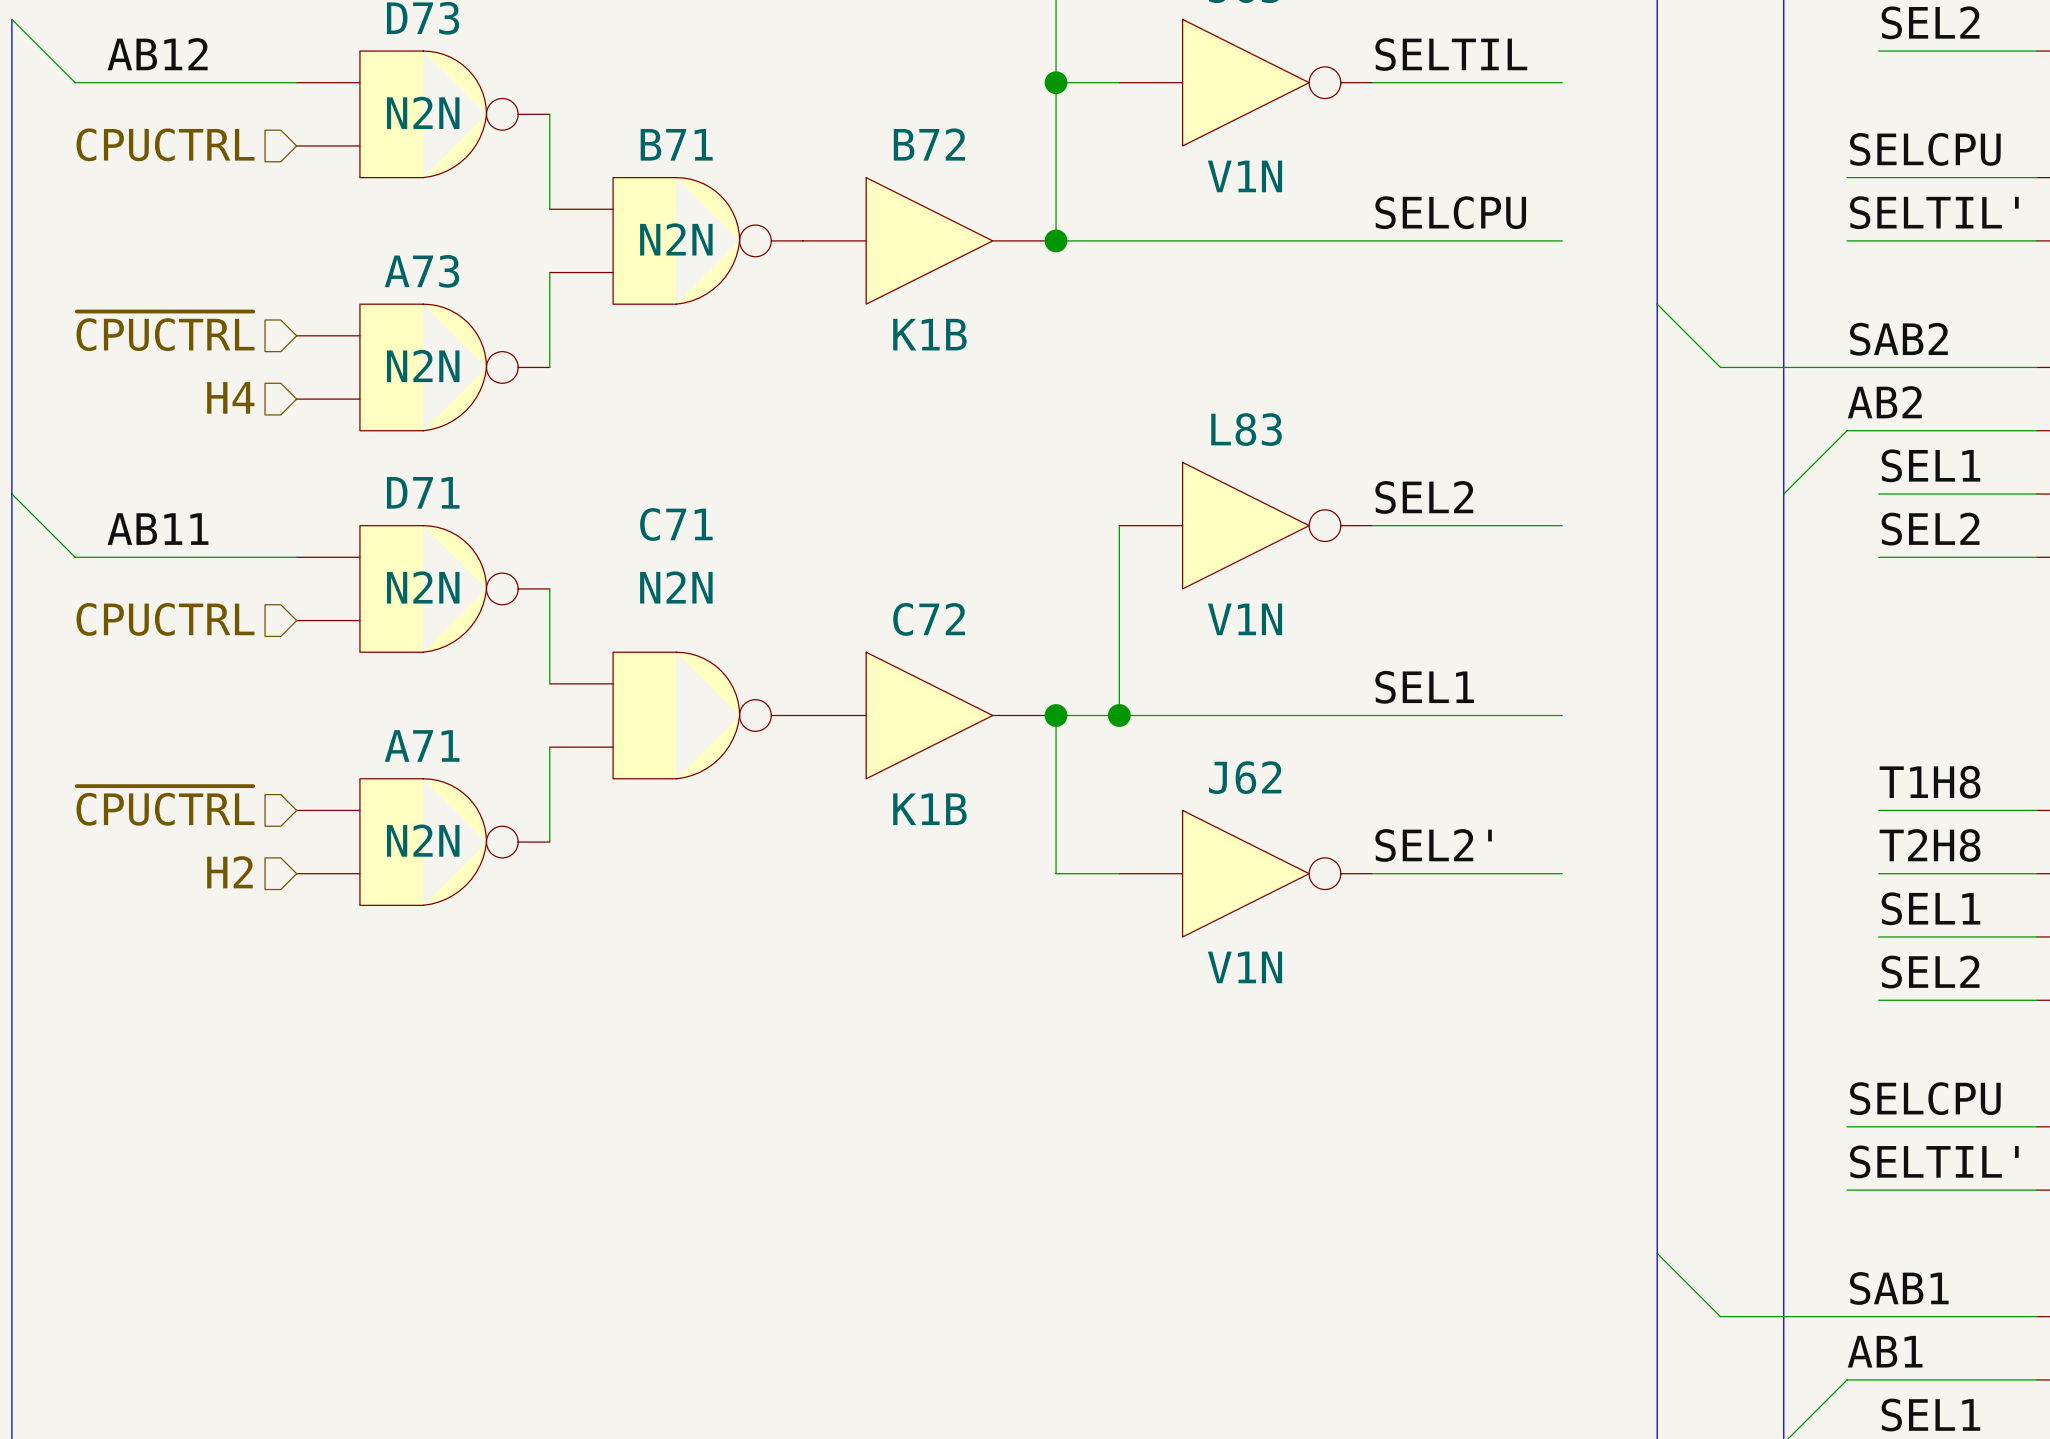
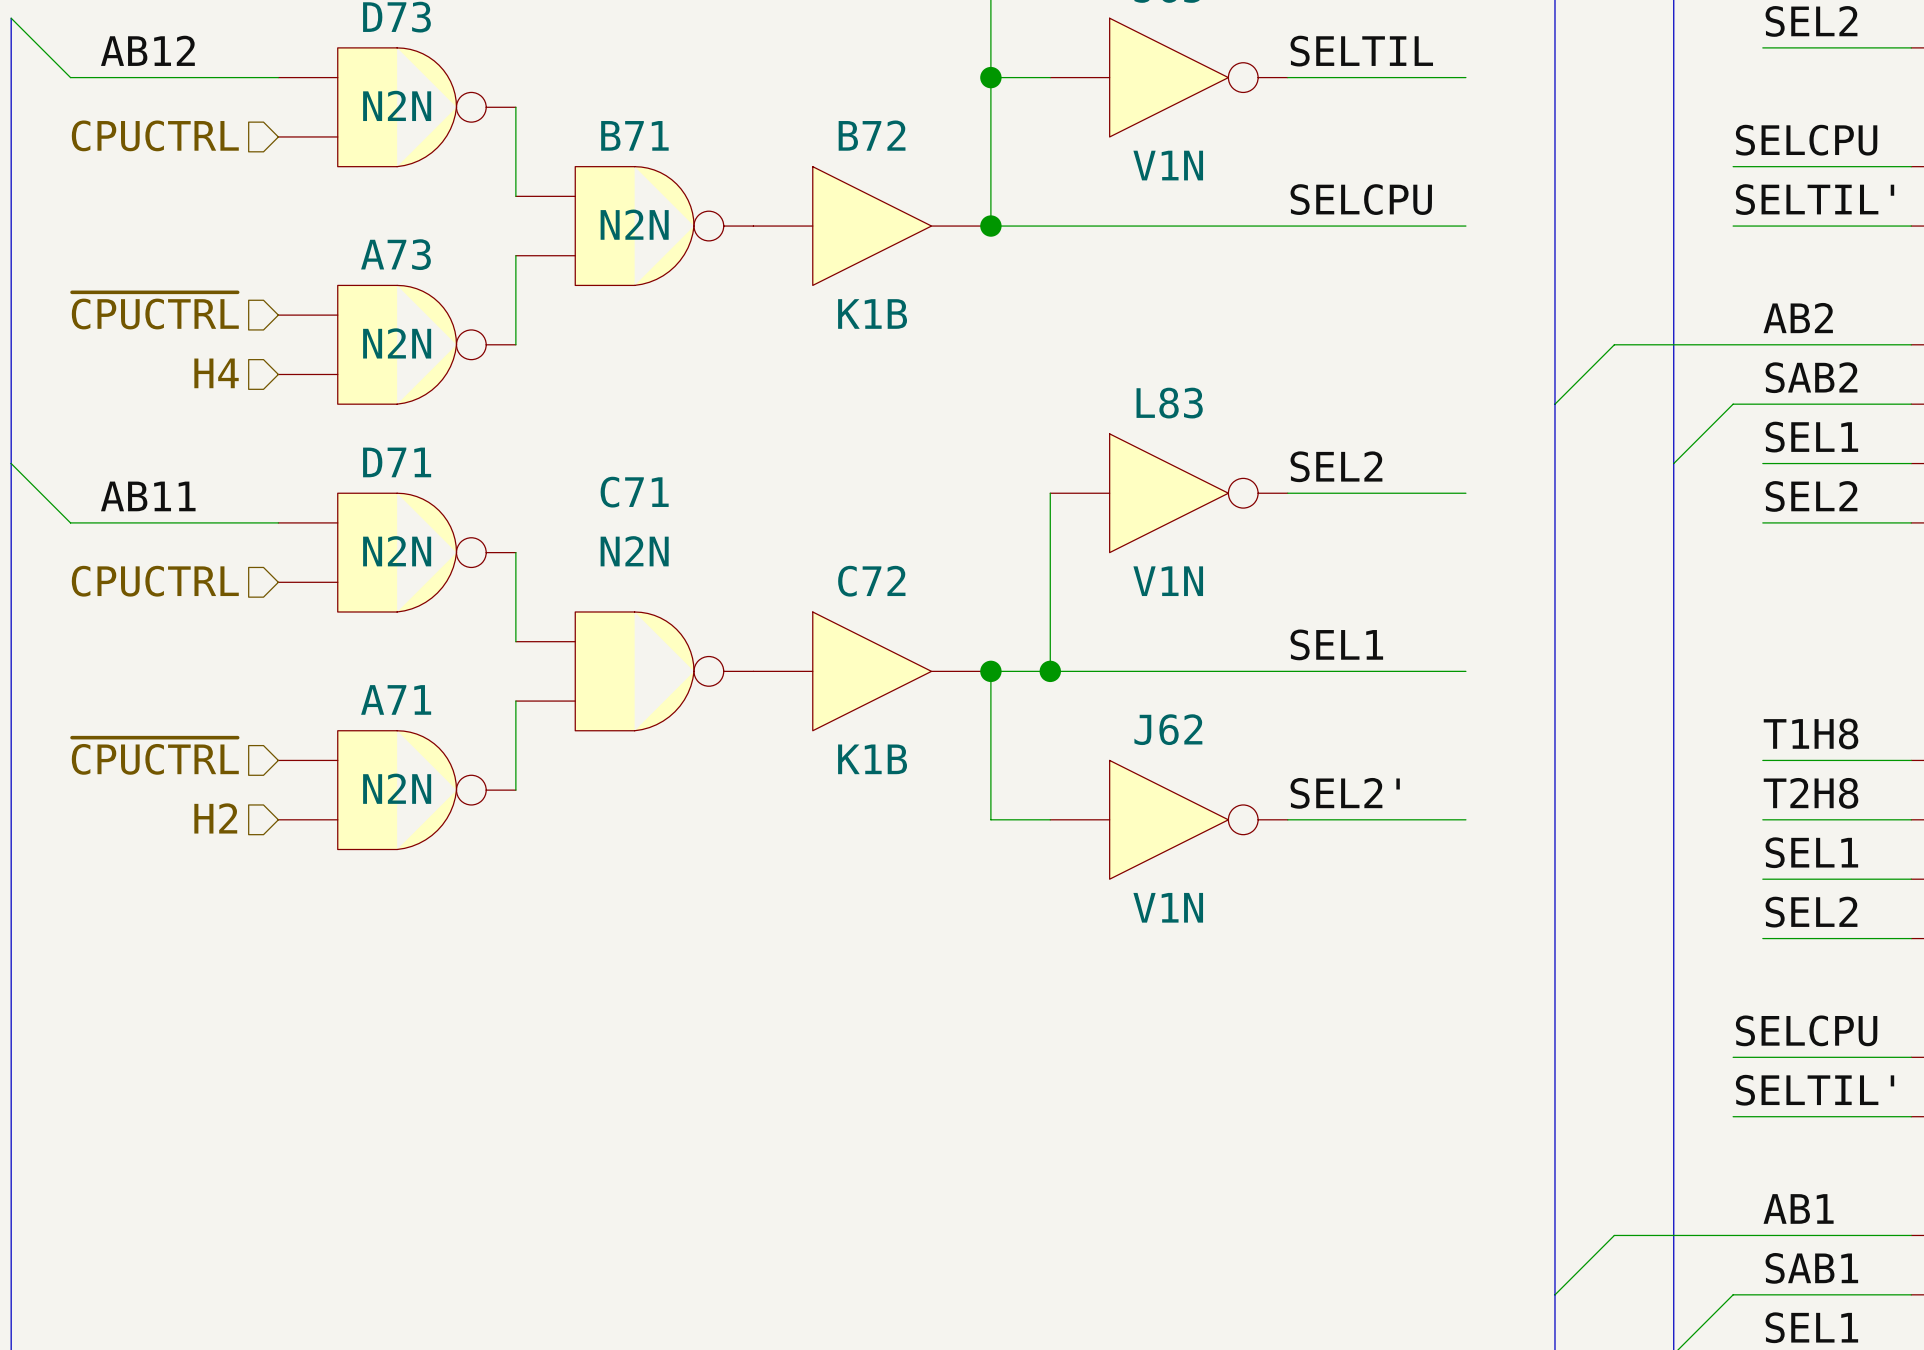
wire: (1657, 304) (1720, 367) -> (1554, 404) (1614, 344)
label position: SAB2 (1898, 339) -> SAB2 (1811, 377)
label position: AB2 (1884, 402) -> AB2 (1798, 318)
wire: (1657, 1253) (1720, 1316) -> (1554, 1294) (1614, 1235)
label position: SAB1 (1899, 1288) -> SAB1 (1811, 1268)
label position: AB1 (1885, 1351) -> AB1 (1798, 1208)

